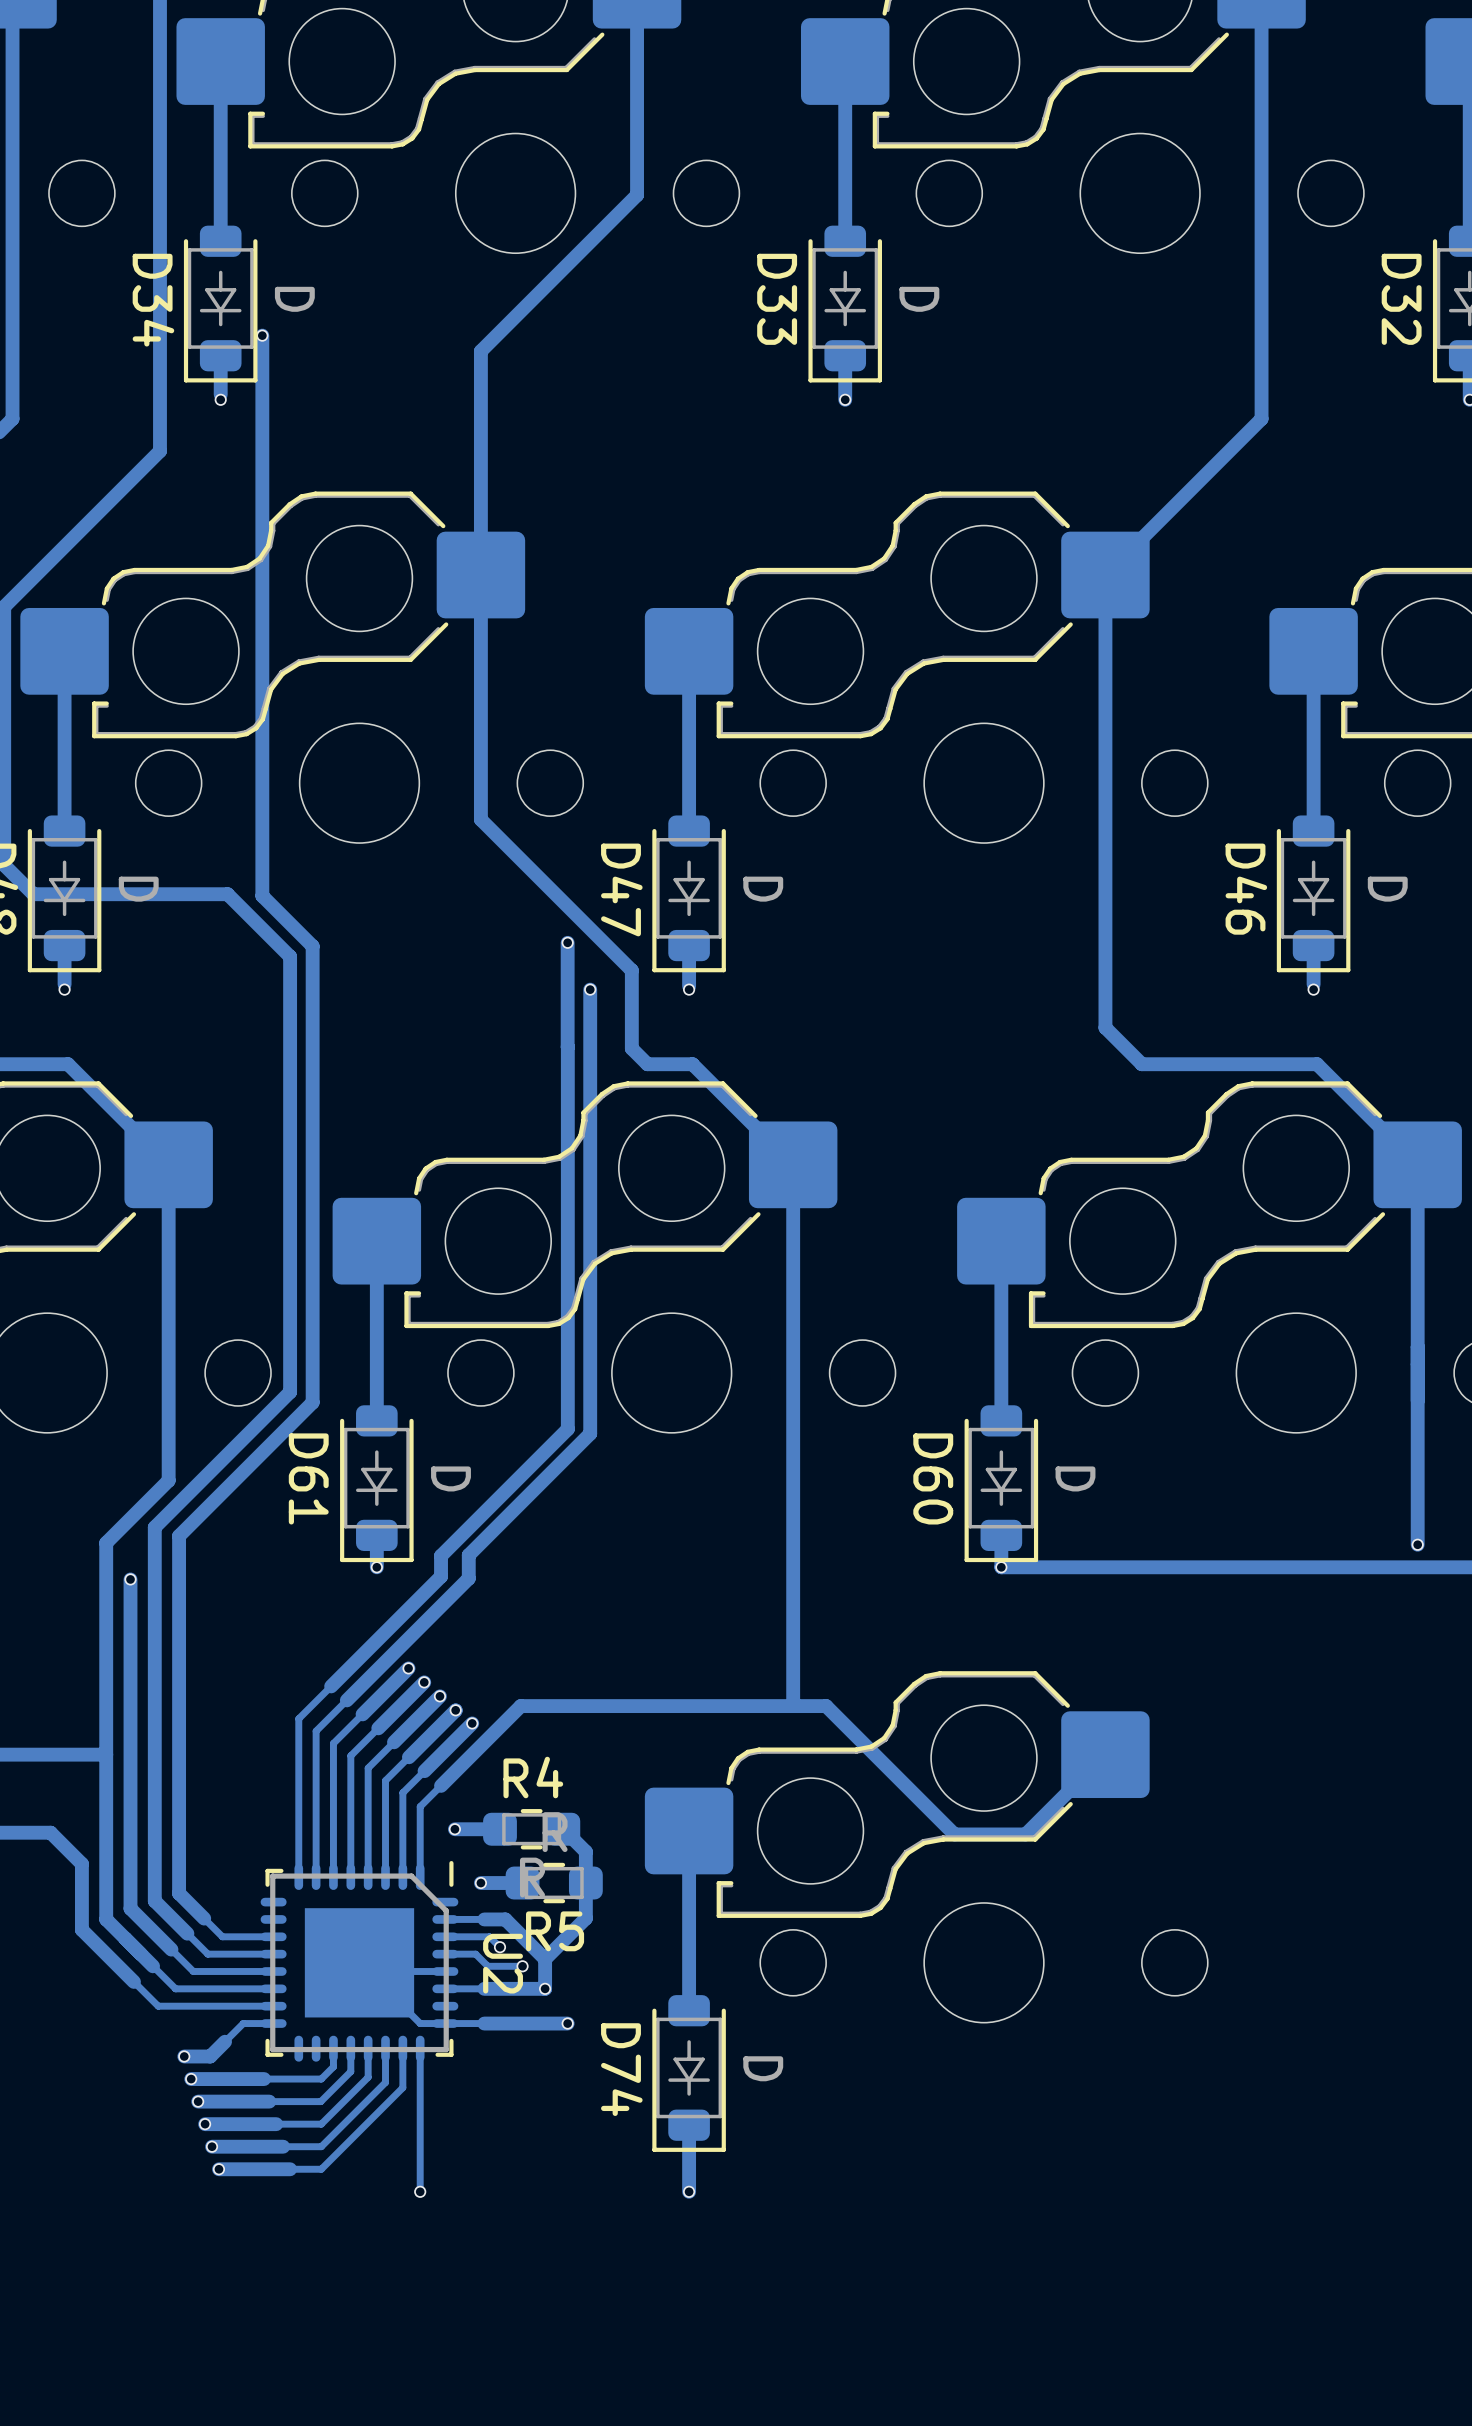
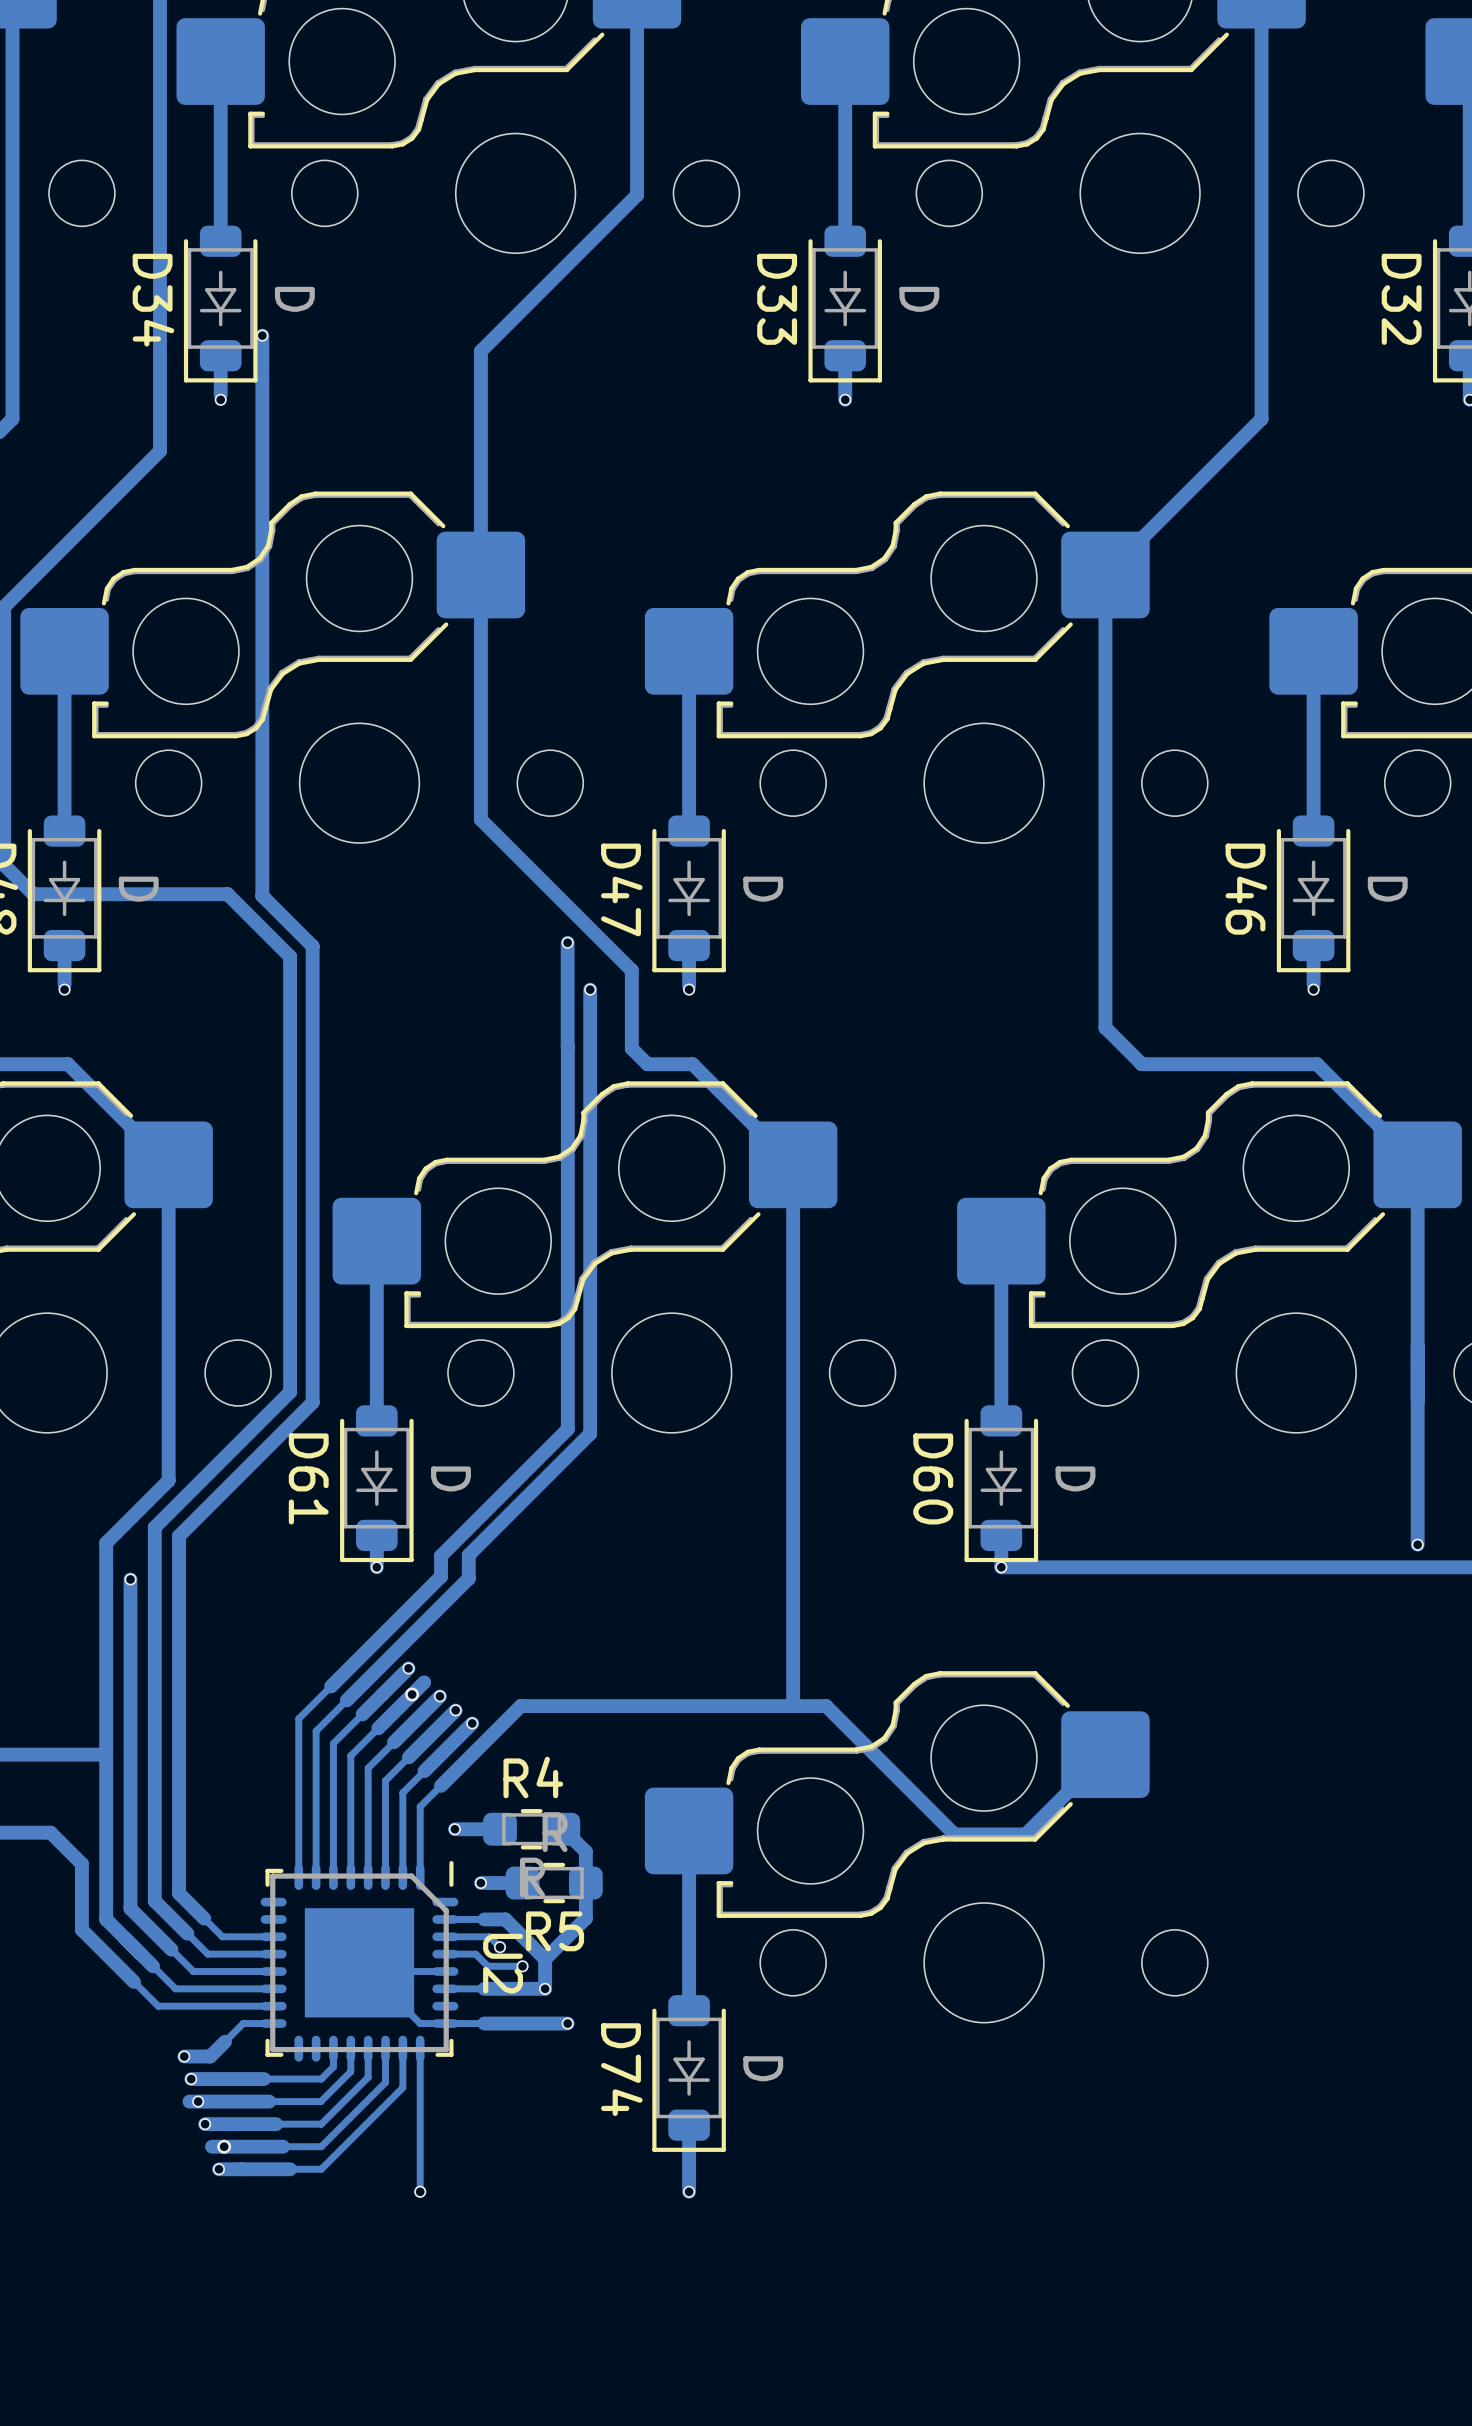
via position: (424, 1682) -> (412, 1694)
track: none -> (198, 2101) (189, 2101)
via position: (212, 2146) -> (224, 2146)

